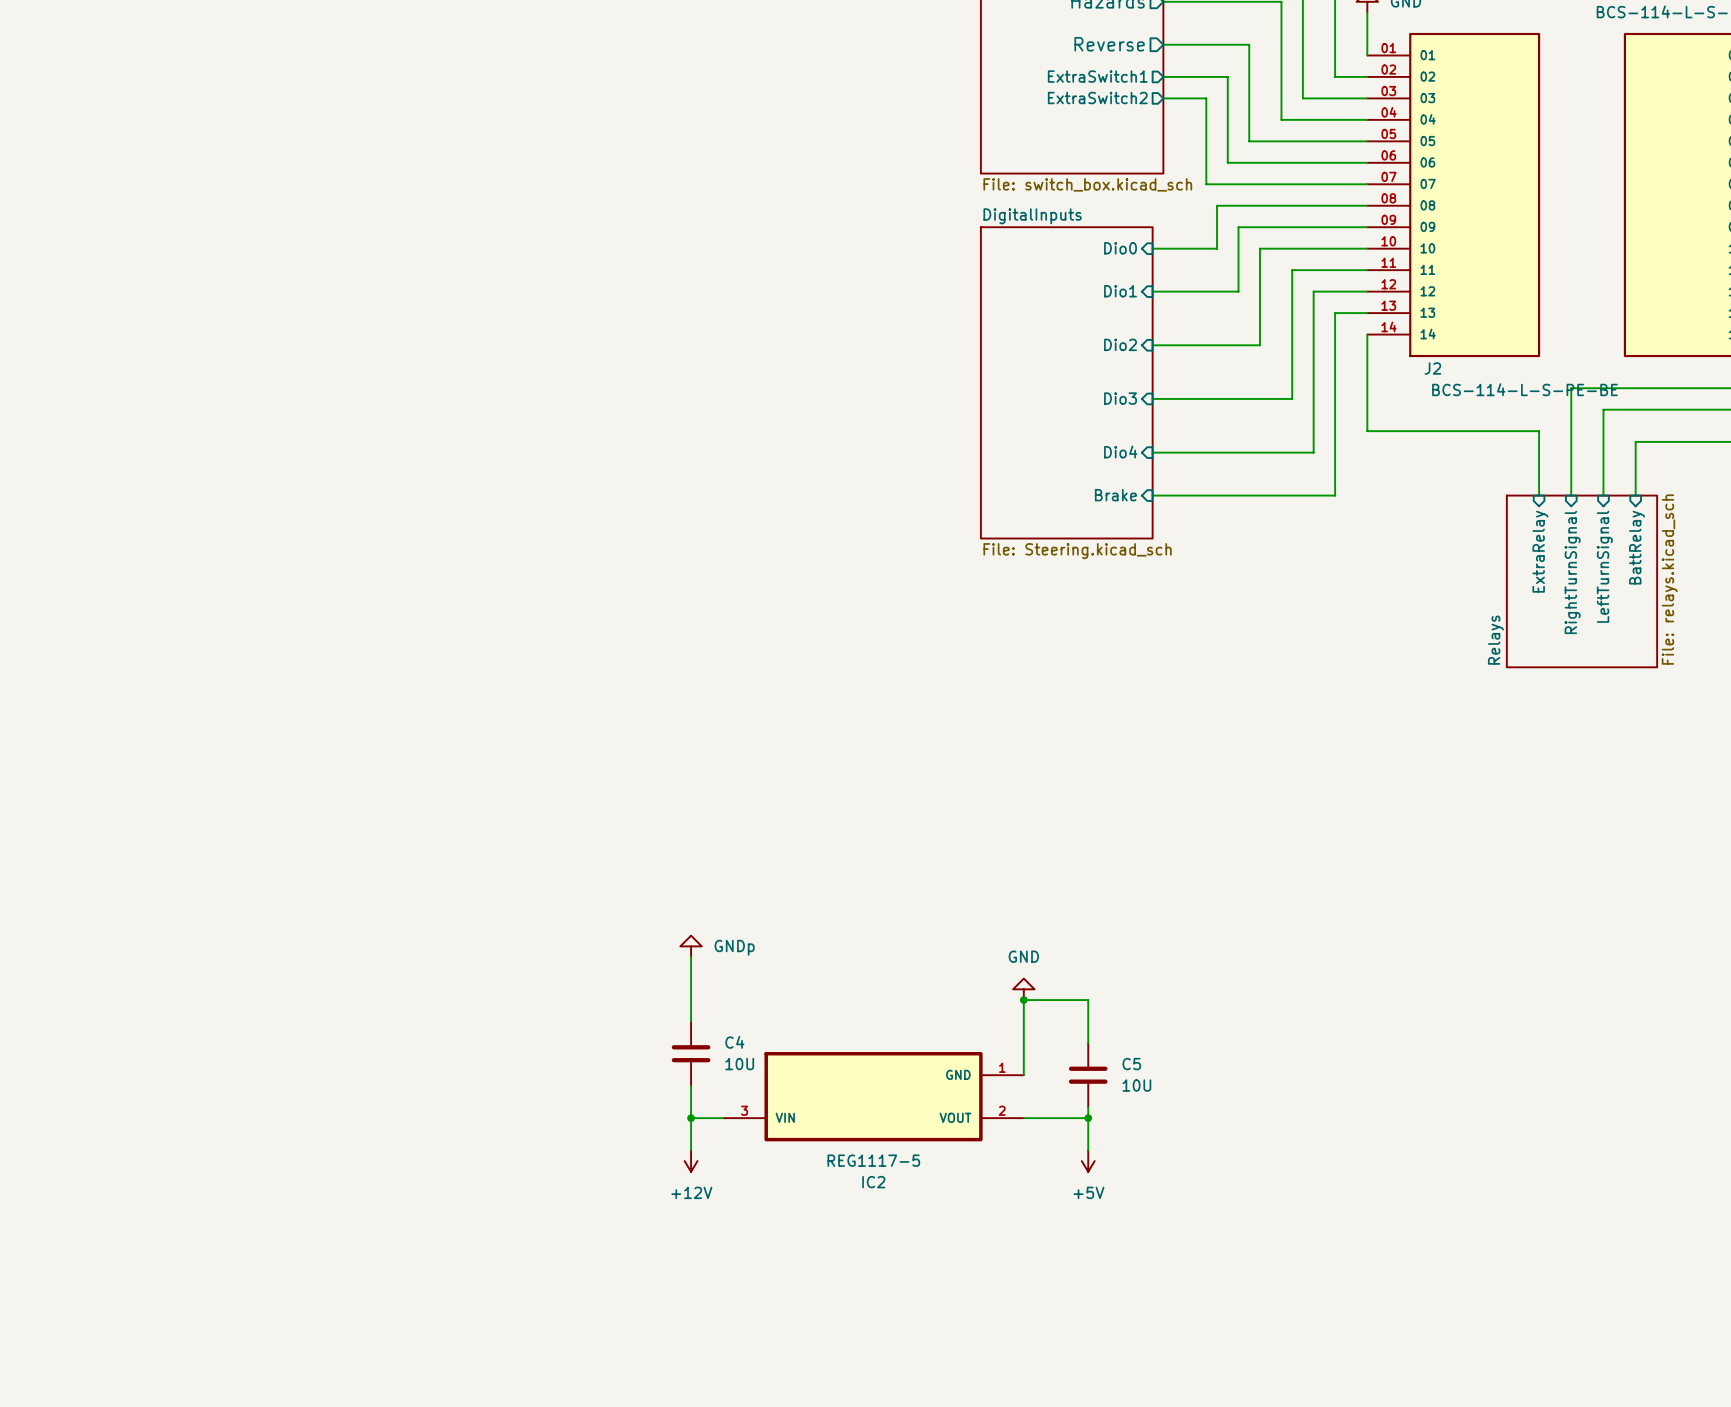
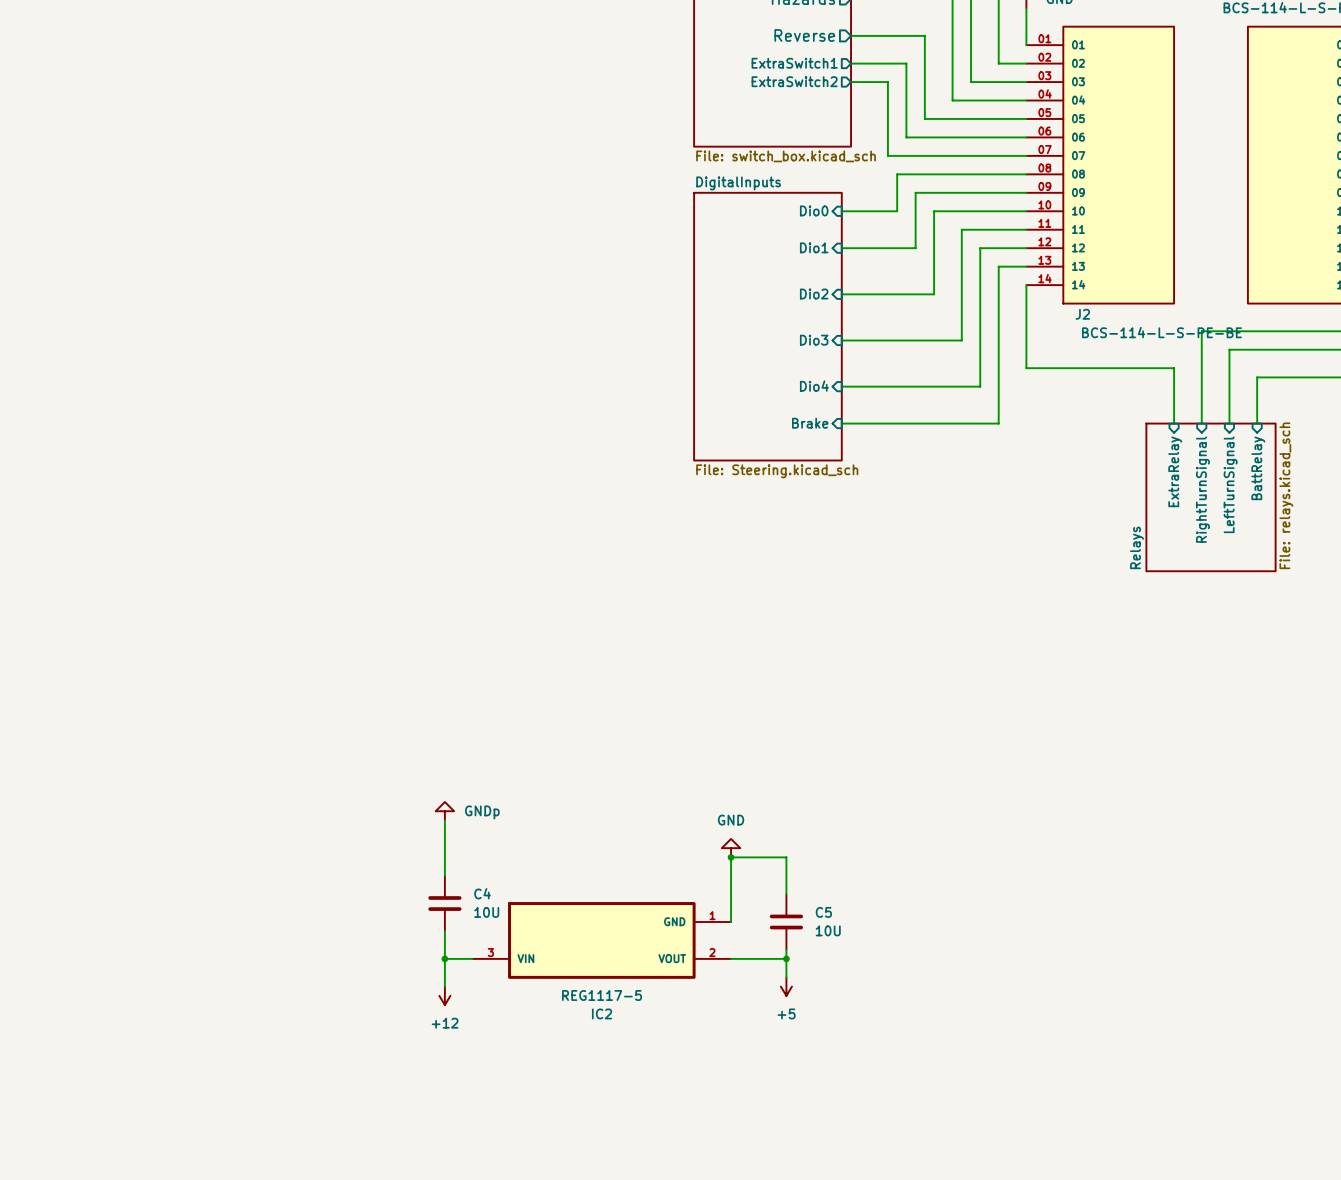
power symbol: none -> +5 (786, 986)
power symbol: +12V (691, 1161) -> +12 (444, 995)
power symbol: +5V (1088, 1161) -> none

